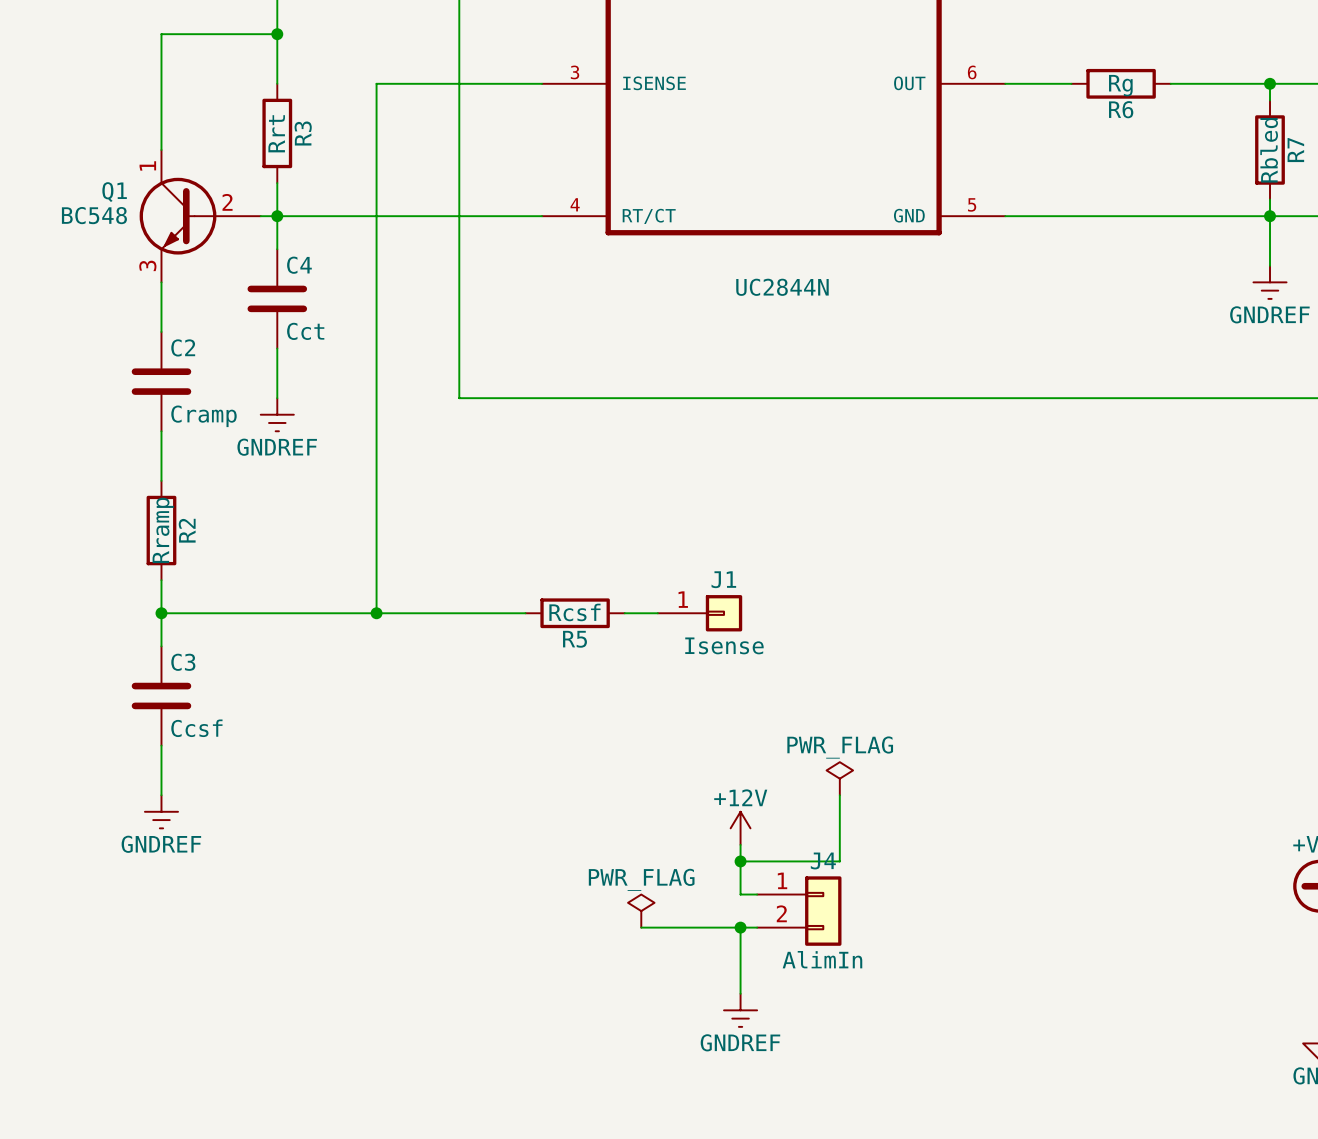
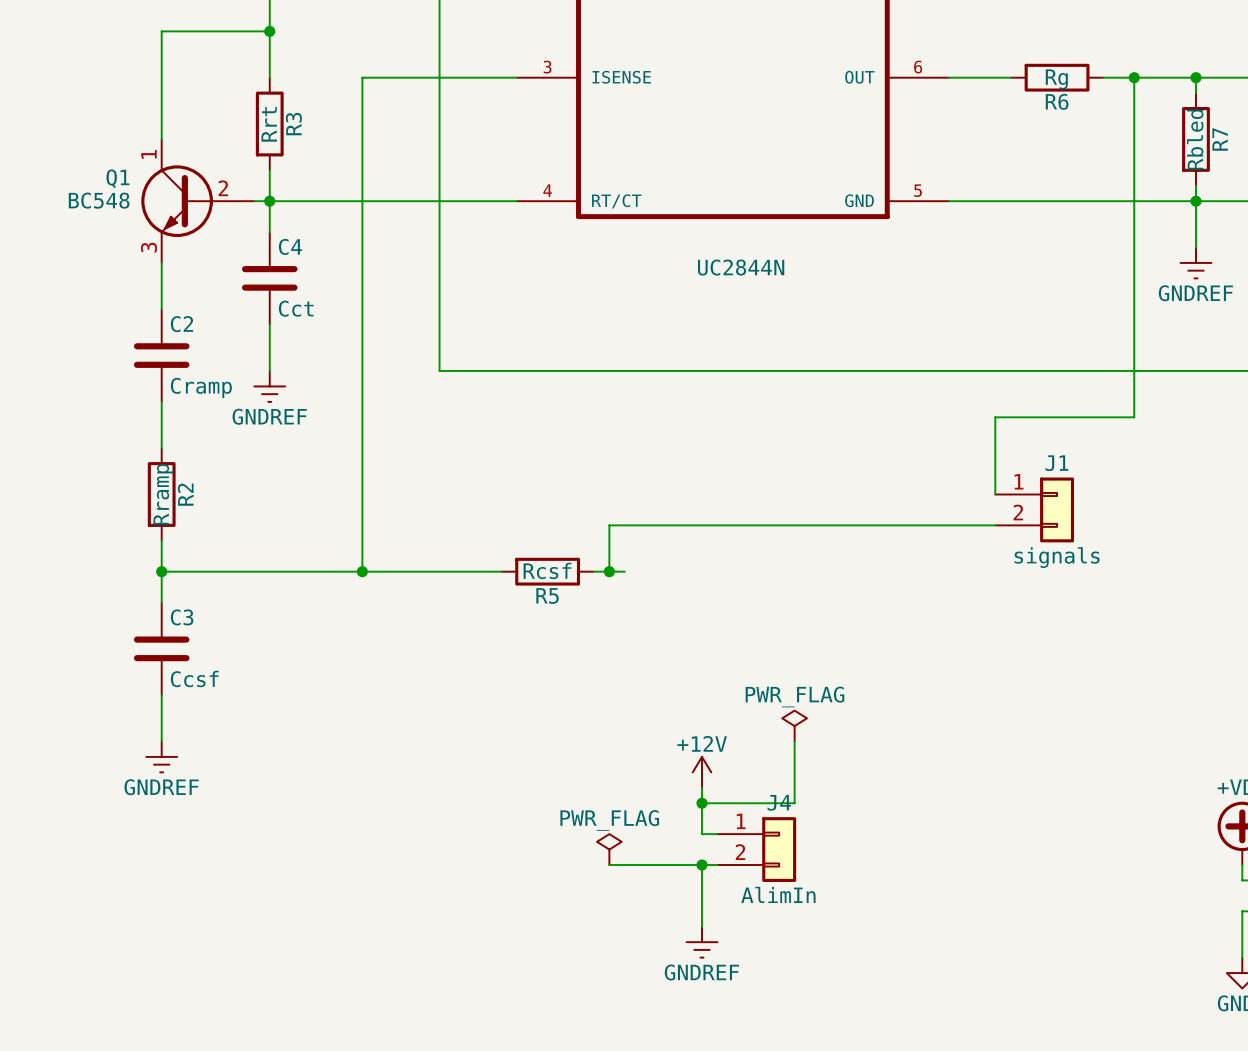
wire: none -> (1134, 77) (1134, 417) (995, 417) (995, 494)
junction: none -> (1134, 77)
wire: none -> (995, 525) (609, 525) (609, 571)
J1 symbol: [657, 595, 743, 632] -> [995, 477, 1075, 543]
junction: none -> (609, 571)
J1 value: Isense (724, 645) -> signals (1057, 557)

